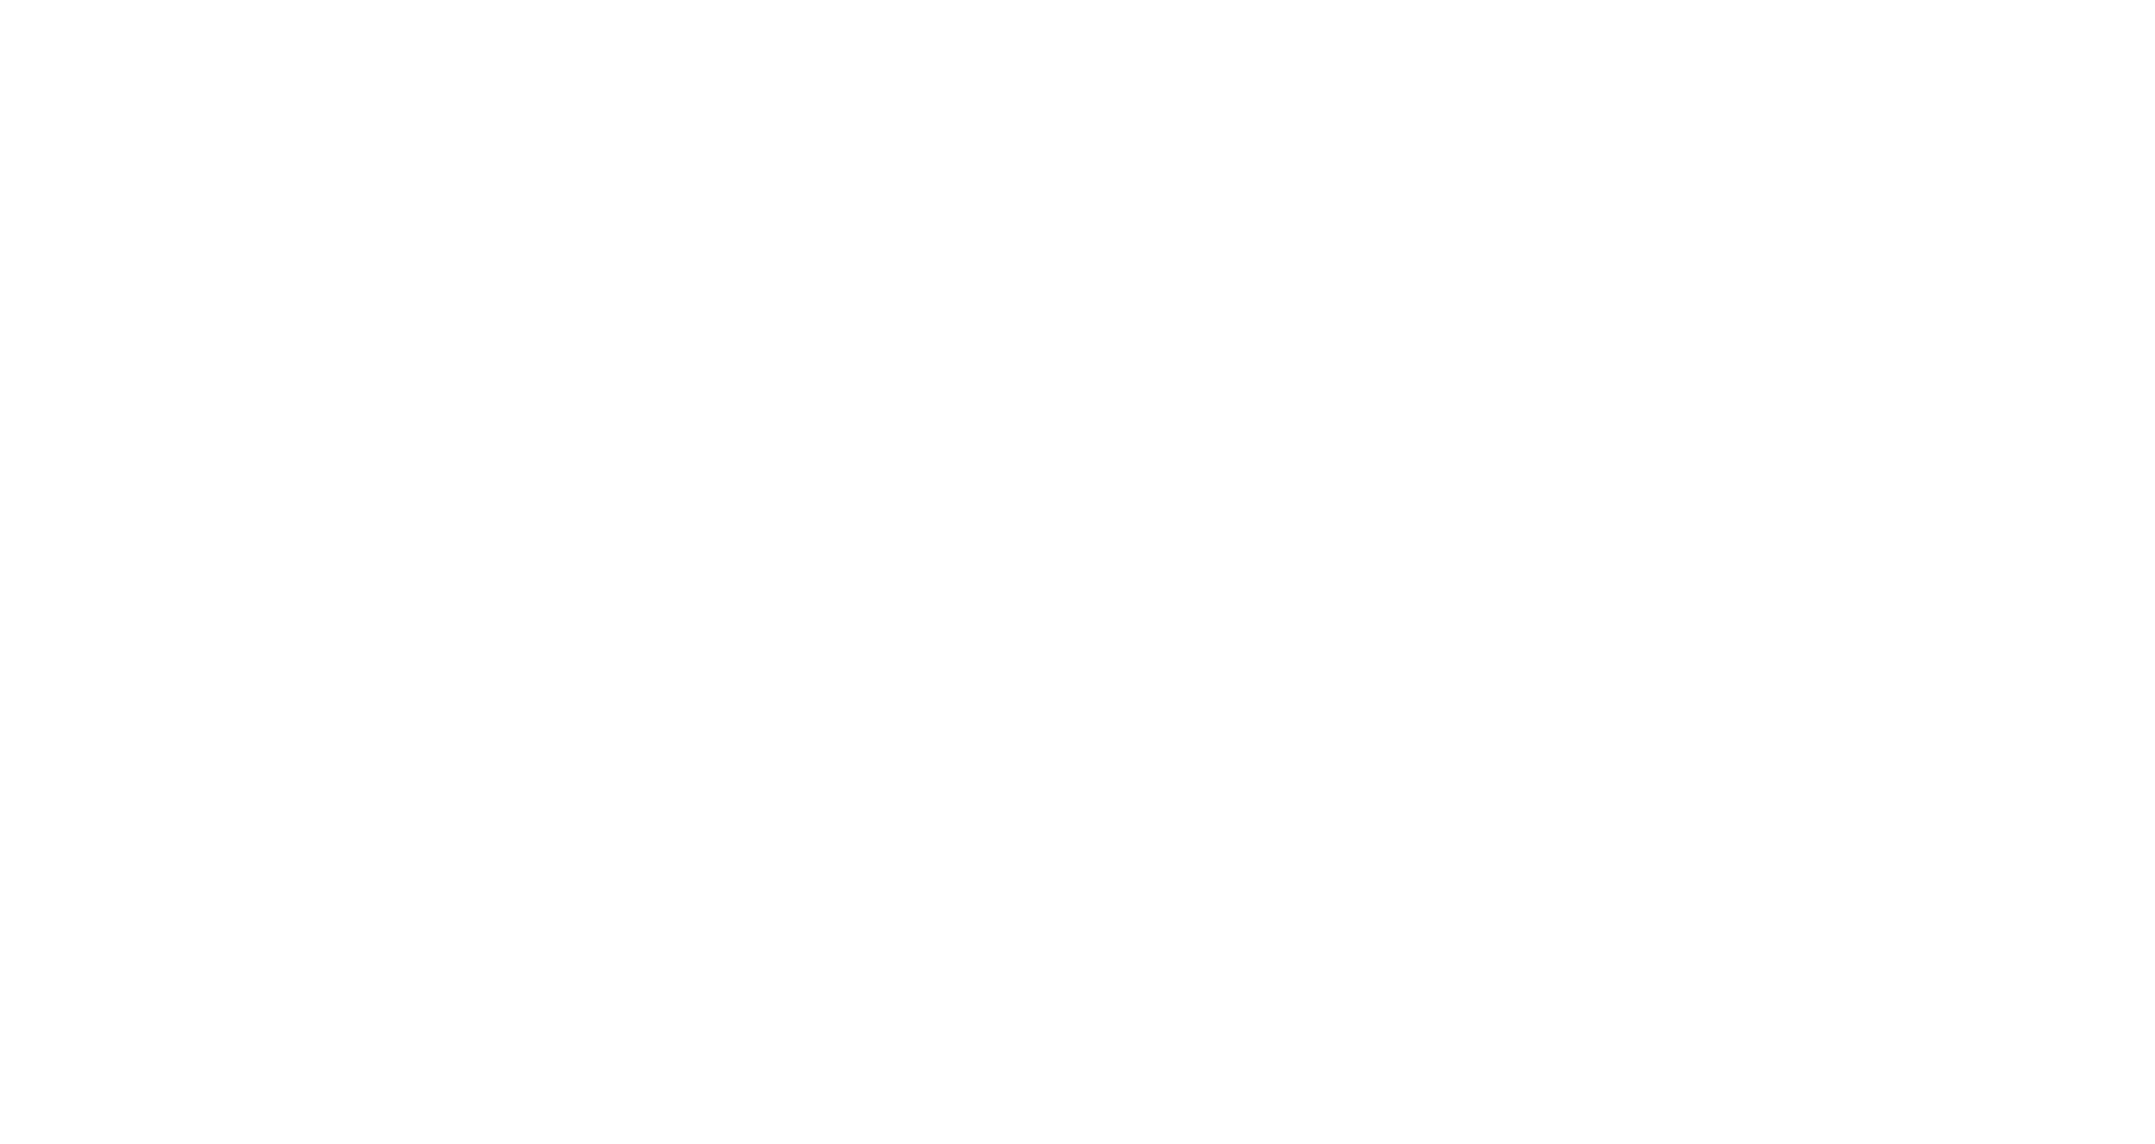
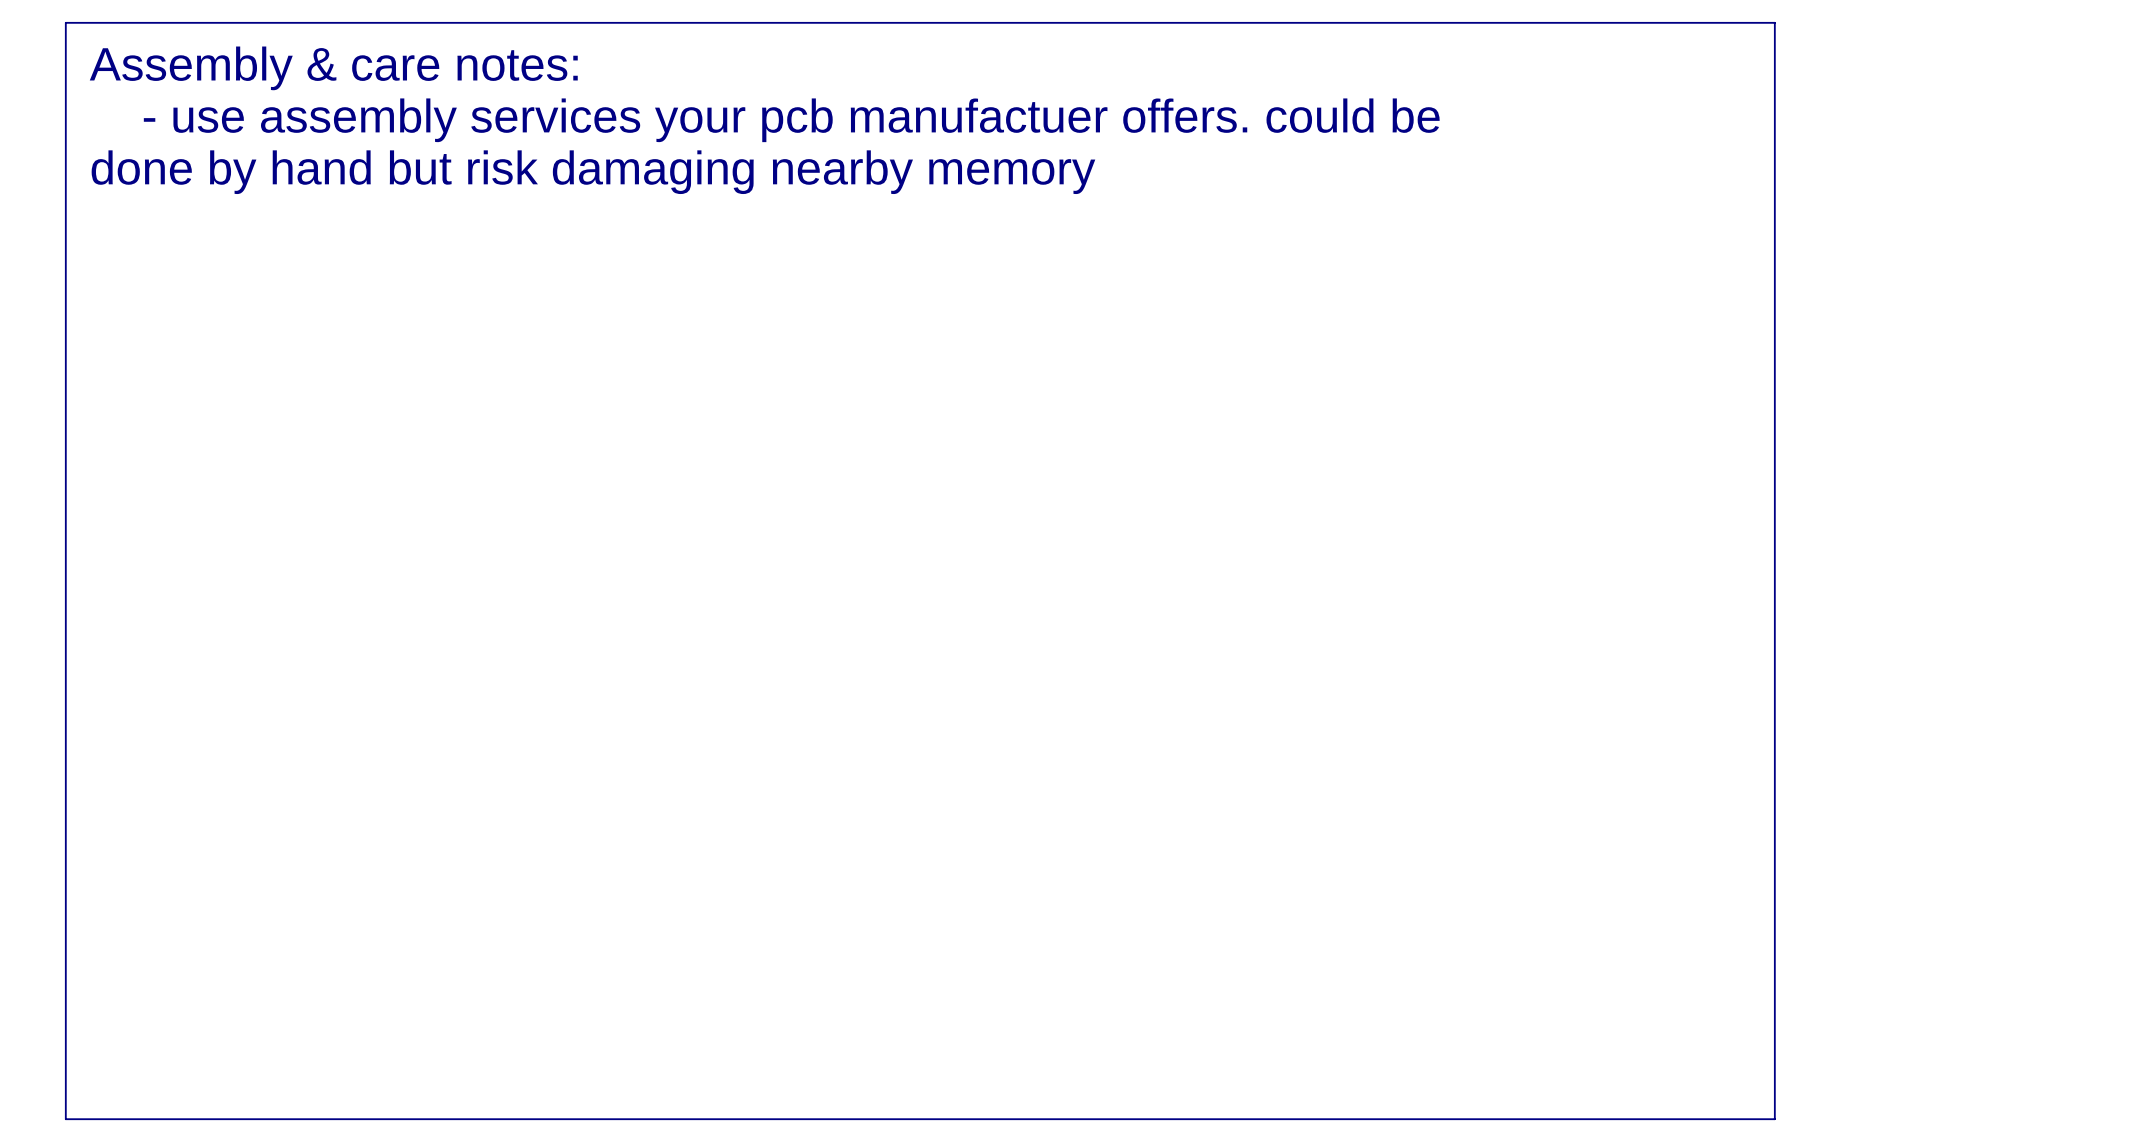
line: none -> (65, 22) (65, 1119) (1774, 1119) (1774, 22) (65, 22)
text: none -> Assembly & care notes: (333, 68)
text: none -> - use assembly services your pcb manufactuer offers. could be (791, 120)
text: none -> done by hand but risk damaging nearby memory (593, 172)

